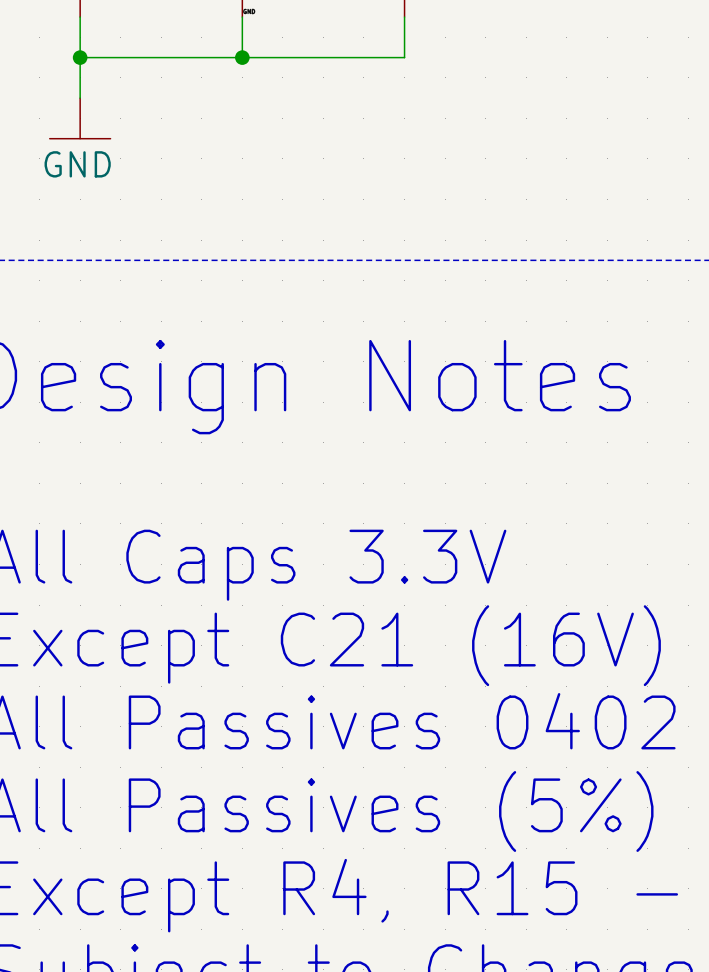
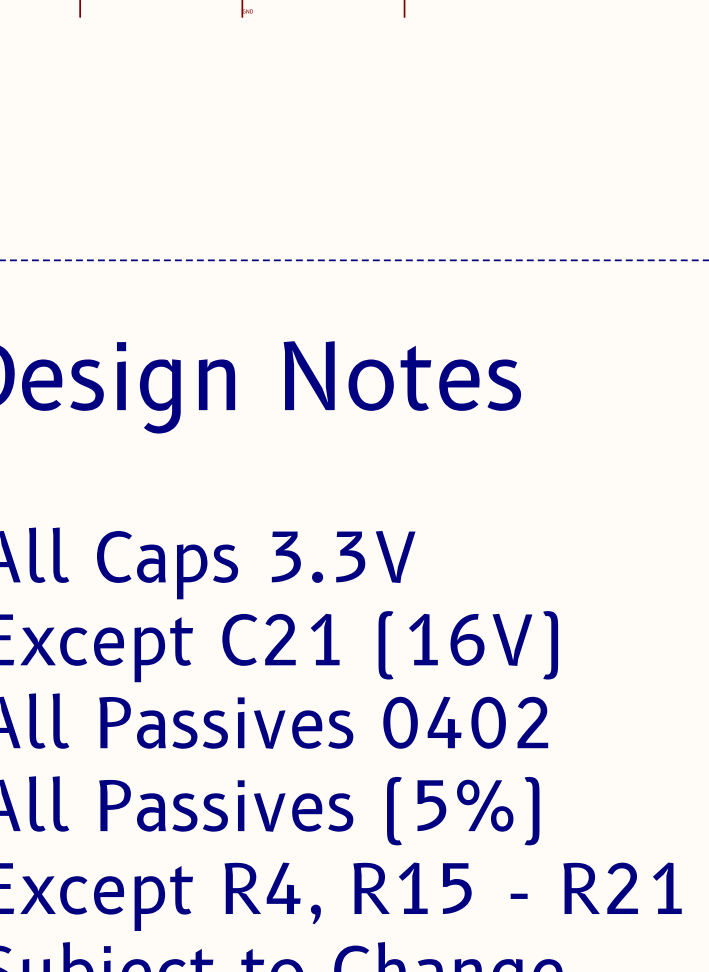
wire: (80, 17) (80, 98) -> none
wire: (242, 17) (242, 57) -> none
wire: (404, 17) (404, 57) (80, 57) -> none
junction: (80, 57) -> none
junction: (242, 57) -> none
power symbol: GND (80, 118) -> none

